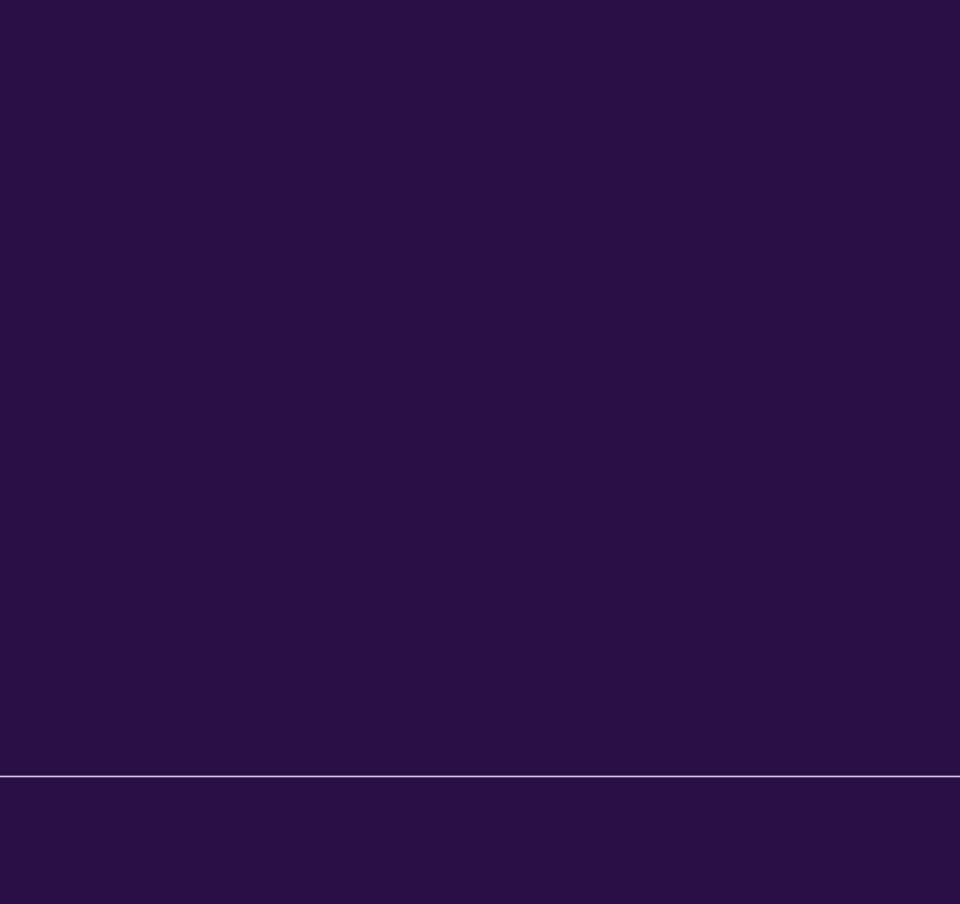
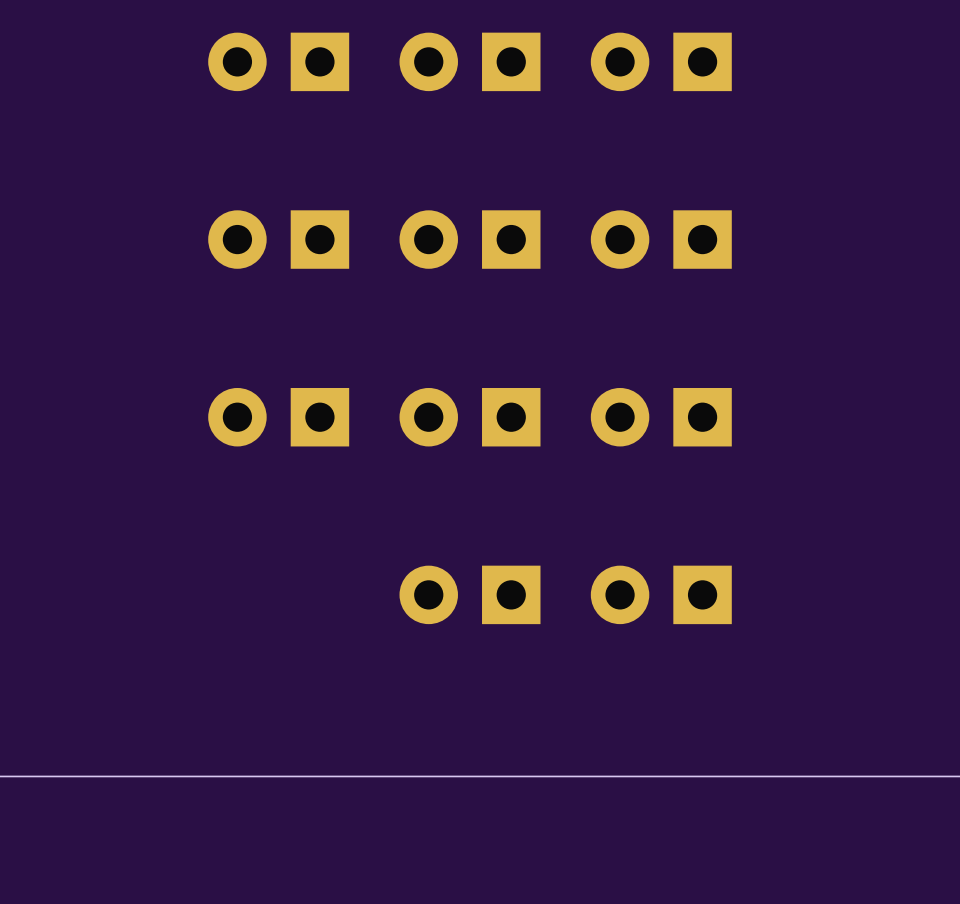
part: none -> (278, 61)
part: none -> (469, 61)
part: none -> (661, 61)
part: none -> (278, 239)
part: none -> (469, 239)
part: none -> (661, 239)
part: none -> (278, 417)
part: none -> (469, 417)
part: none -> (661, 417)
part: none -> (469, 594)
part: none -> (661, 594)

